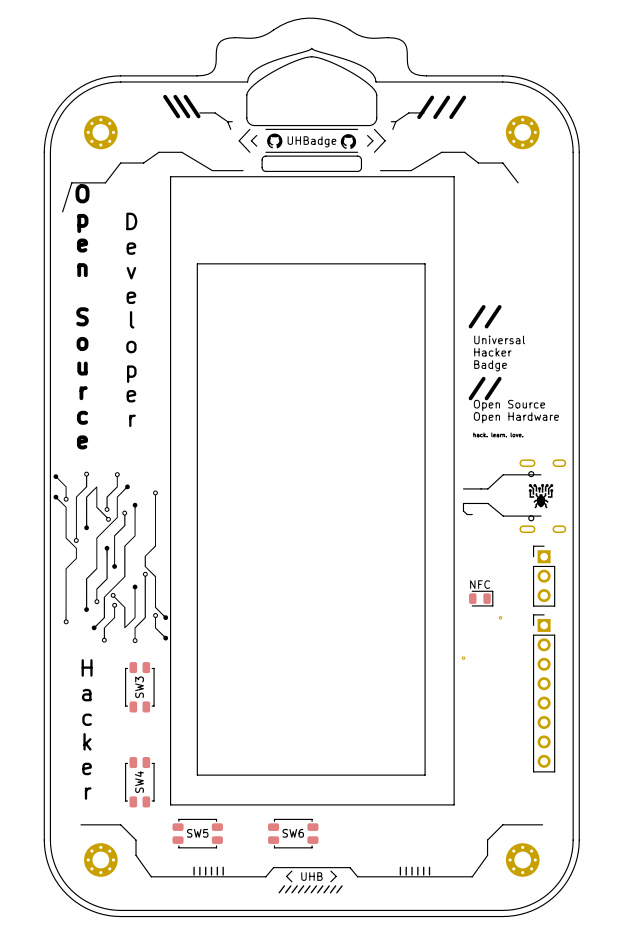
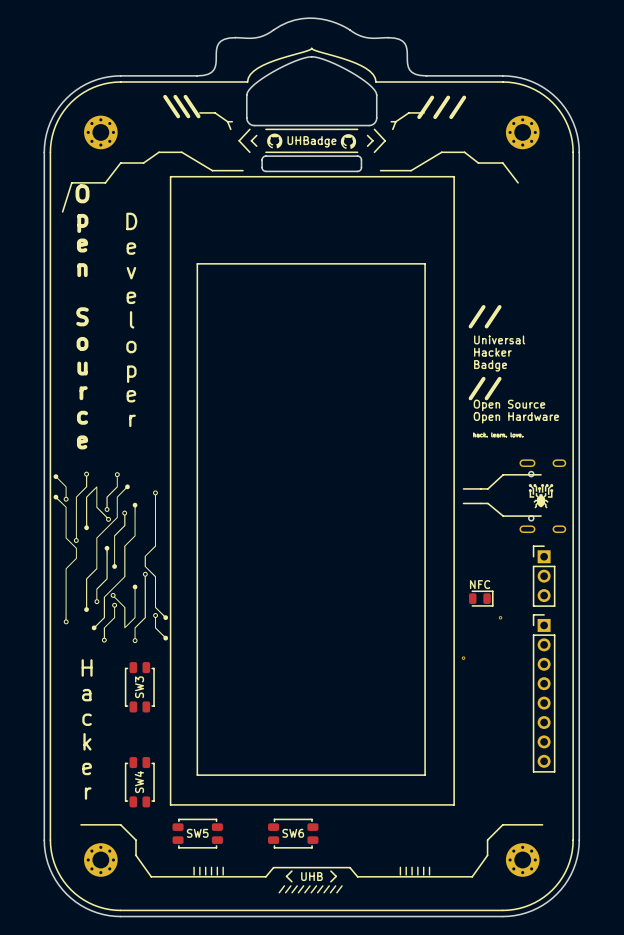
line: (463, 503) (463, 511) (467, 514) (472, 514) -> none

